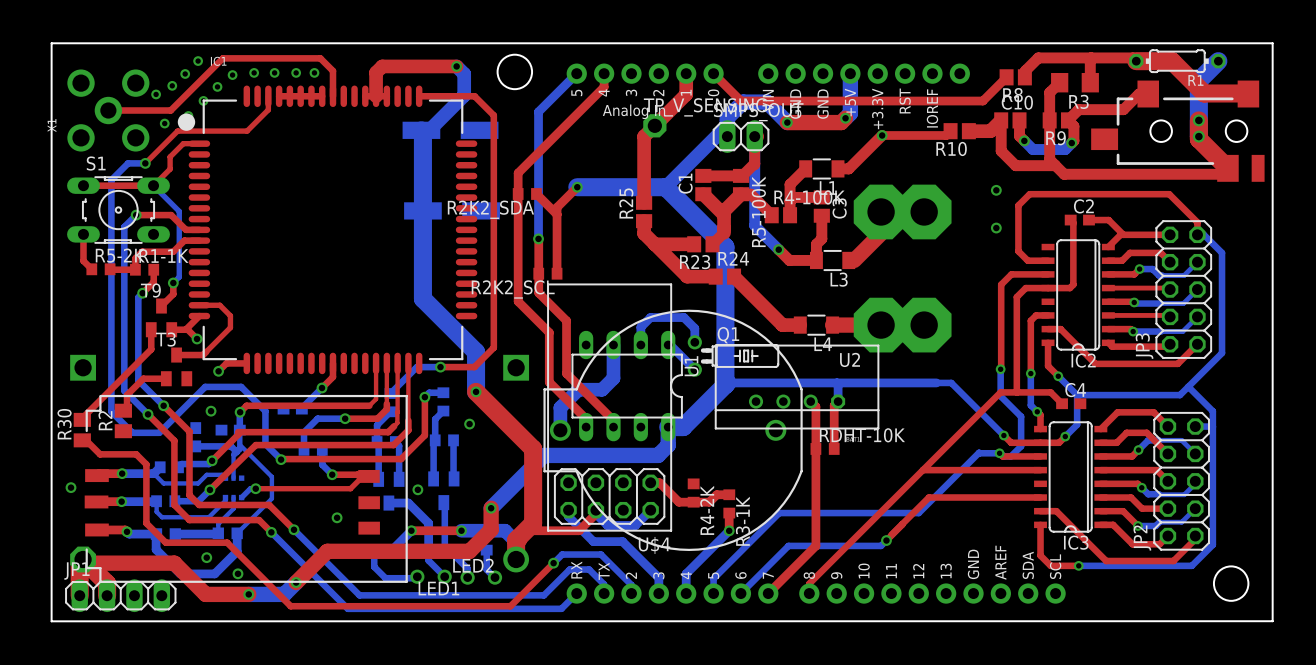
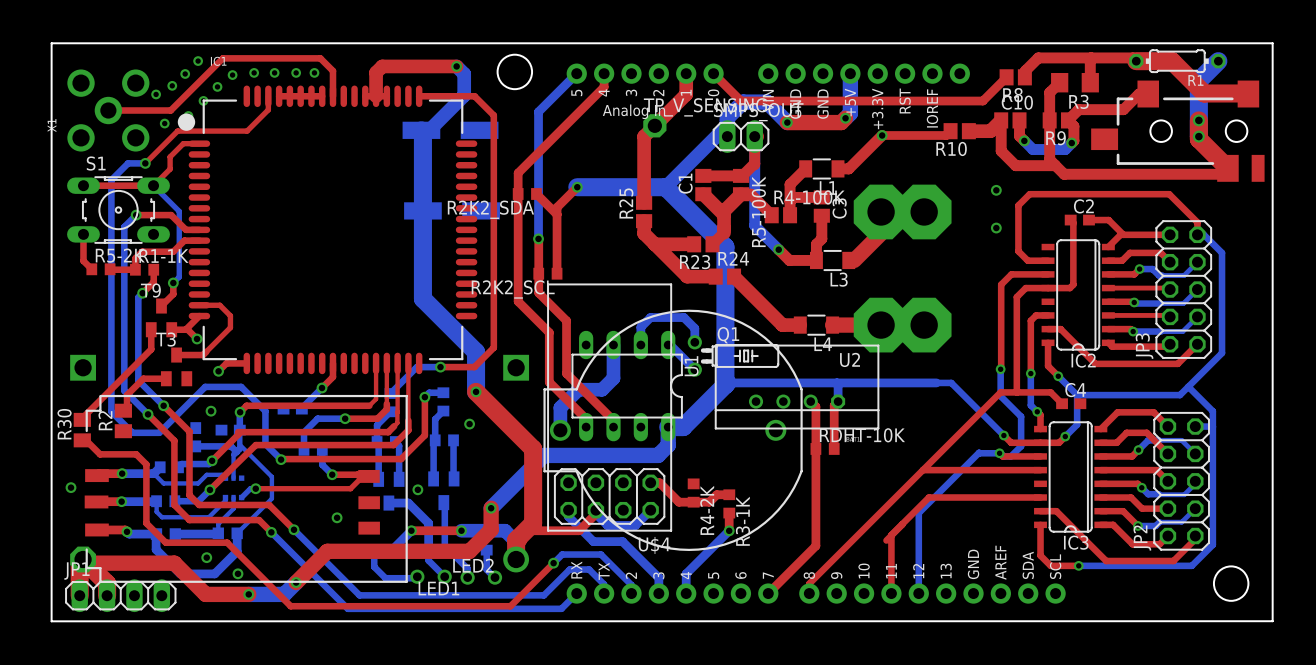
bottom track: (918, 513) (779, 513) (713, 578) (713, 593) -> (918, 513) (918, 593)
top track: none -> (891, 535) (891, 593)
bottom track: (886, 540) (881, 545) (788, 545) (740, 593) -> none
via: (886, 540) -> none

